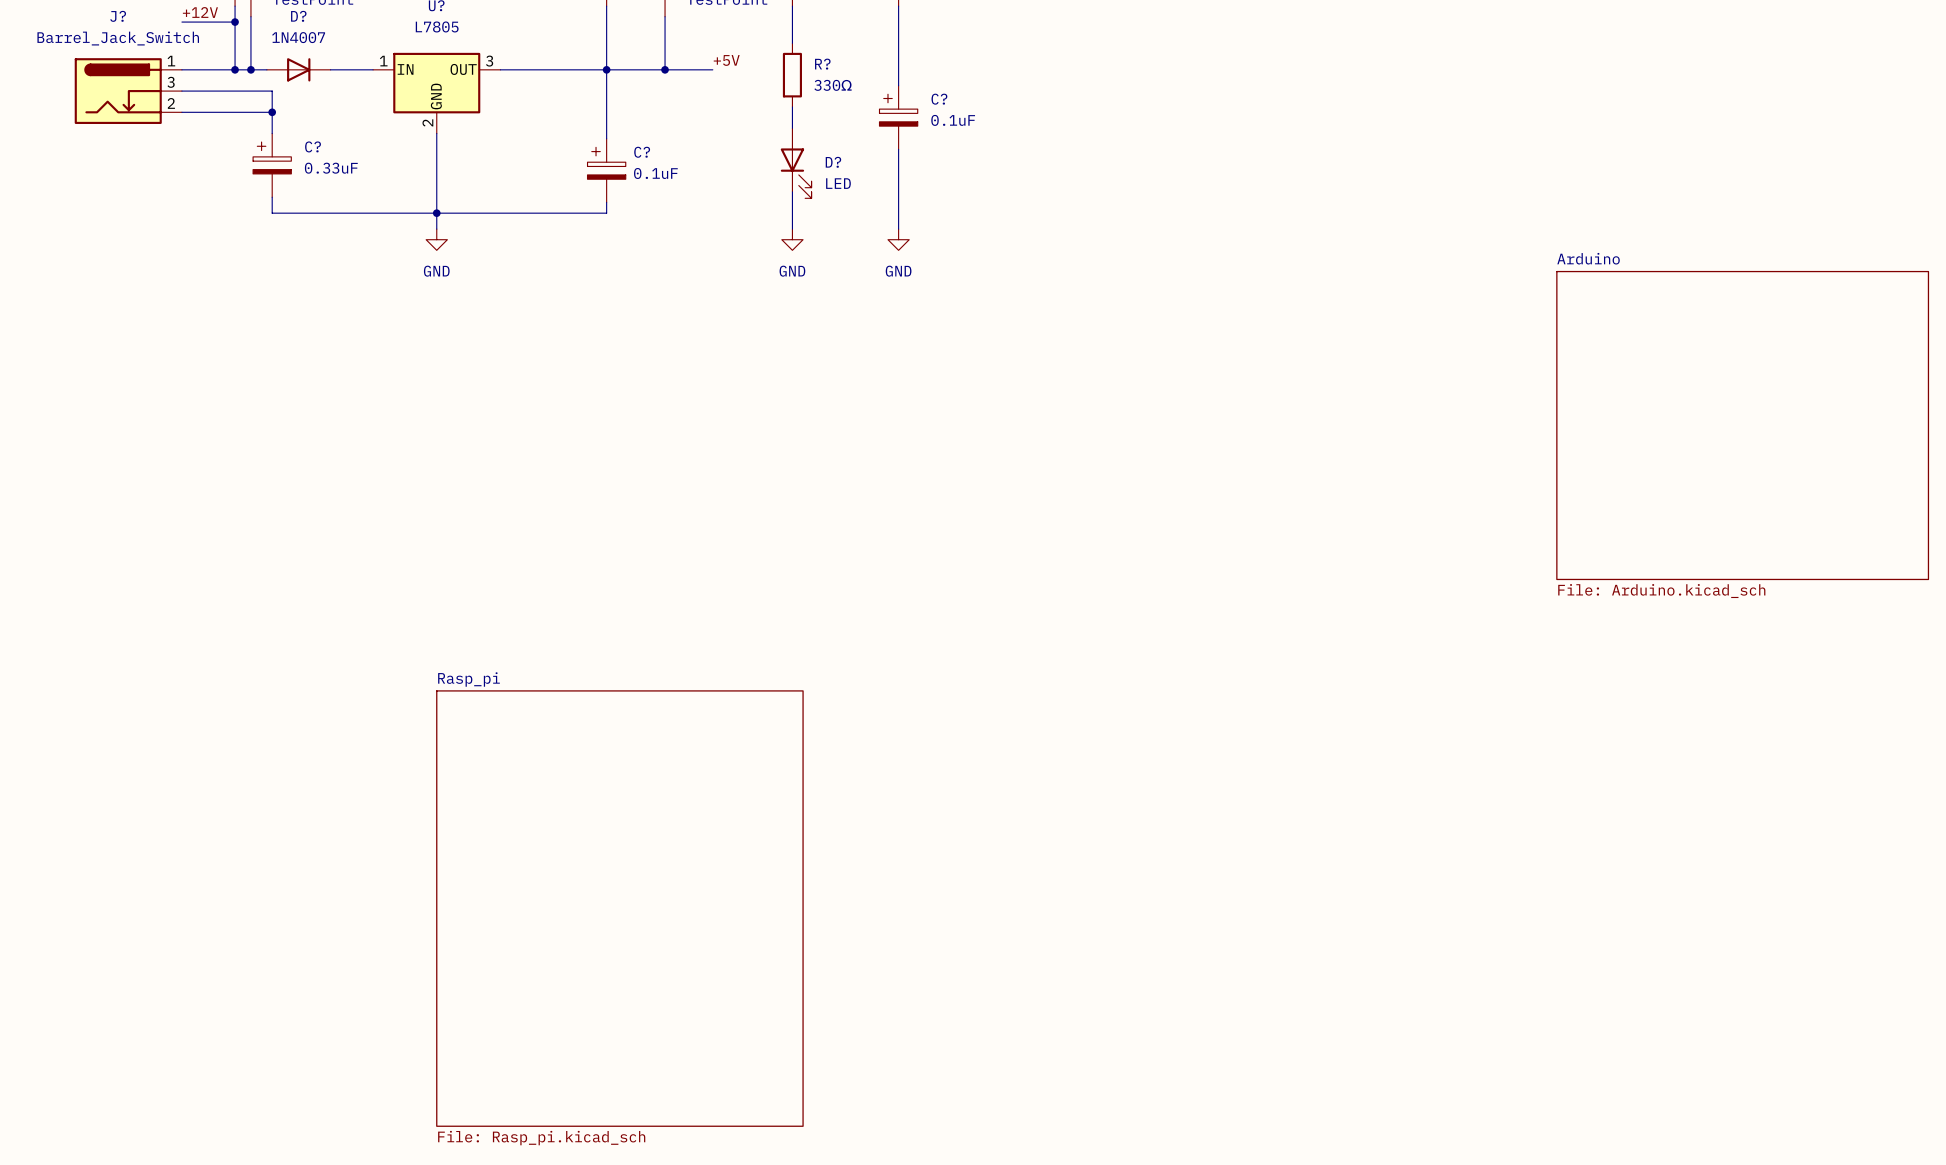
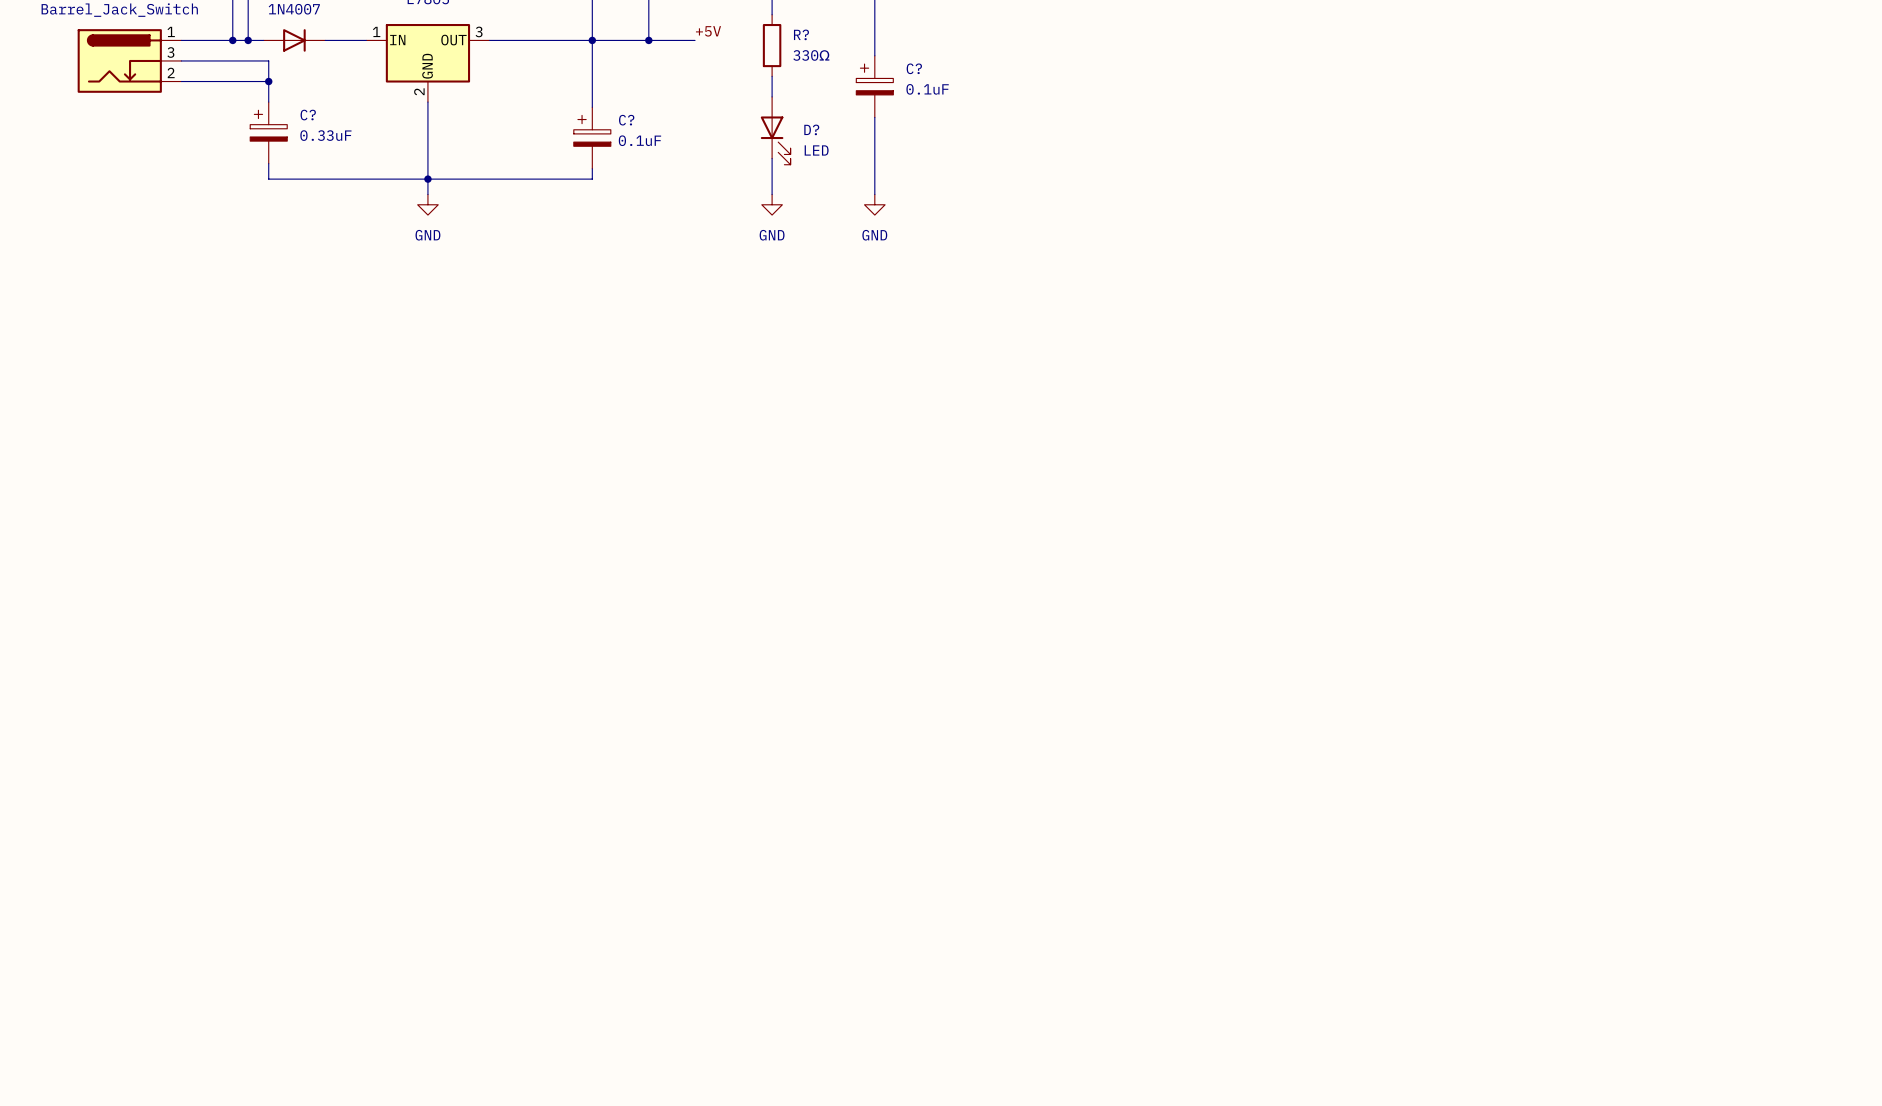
sheet Arduino: File: Arduino.kicad_sch (1742, 425) -> none
sheet Rasp_pi: File: Rasp_pi.kicad_sch (619, 908) -> none

